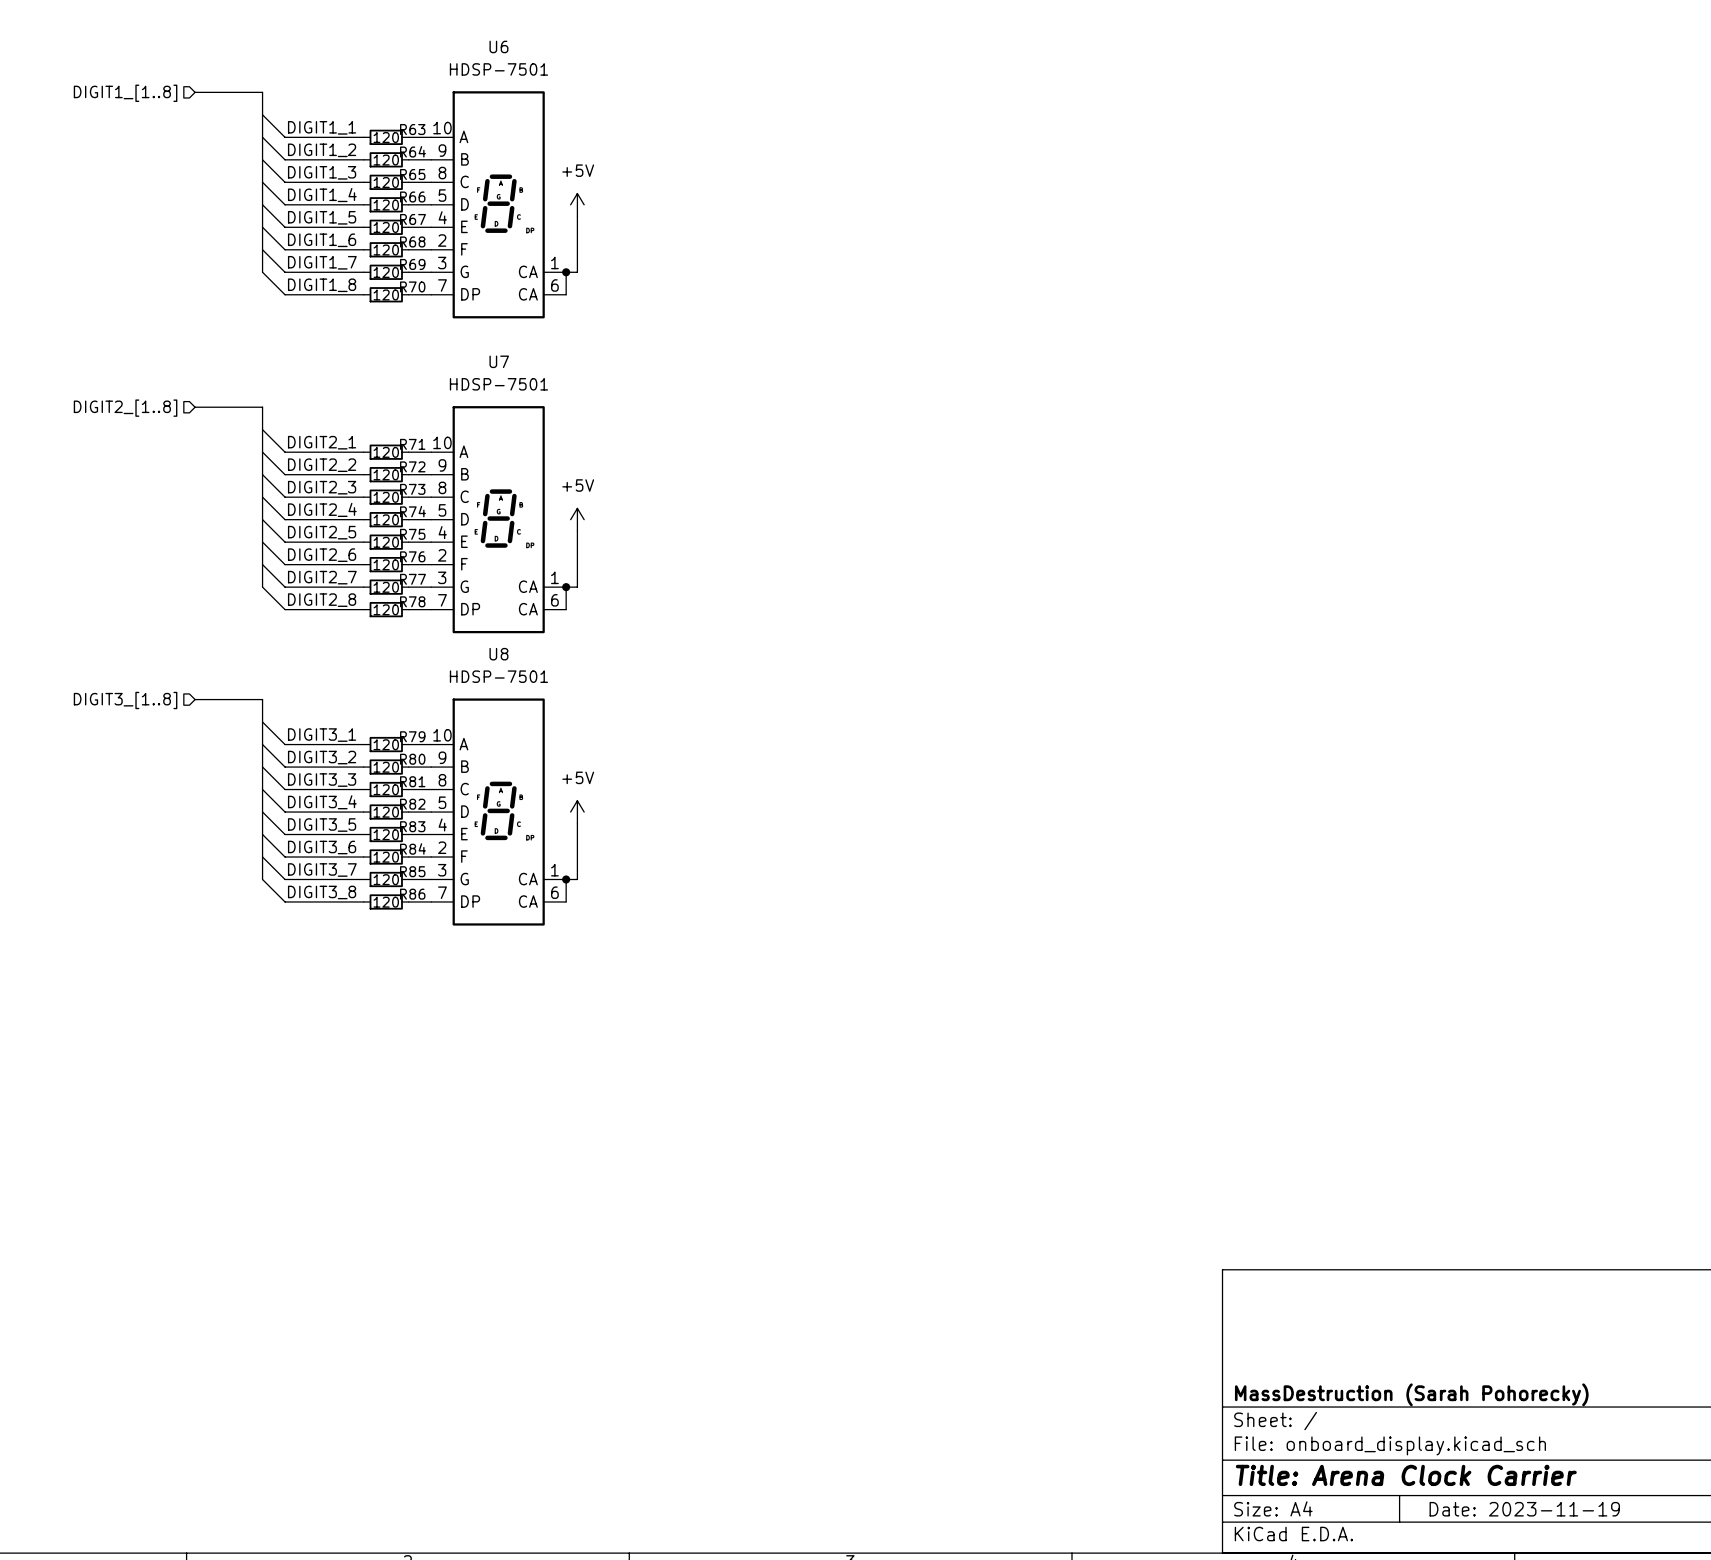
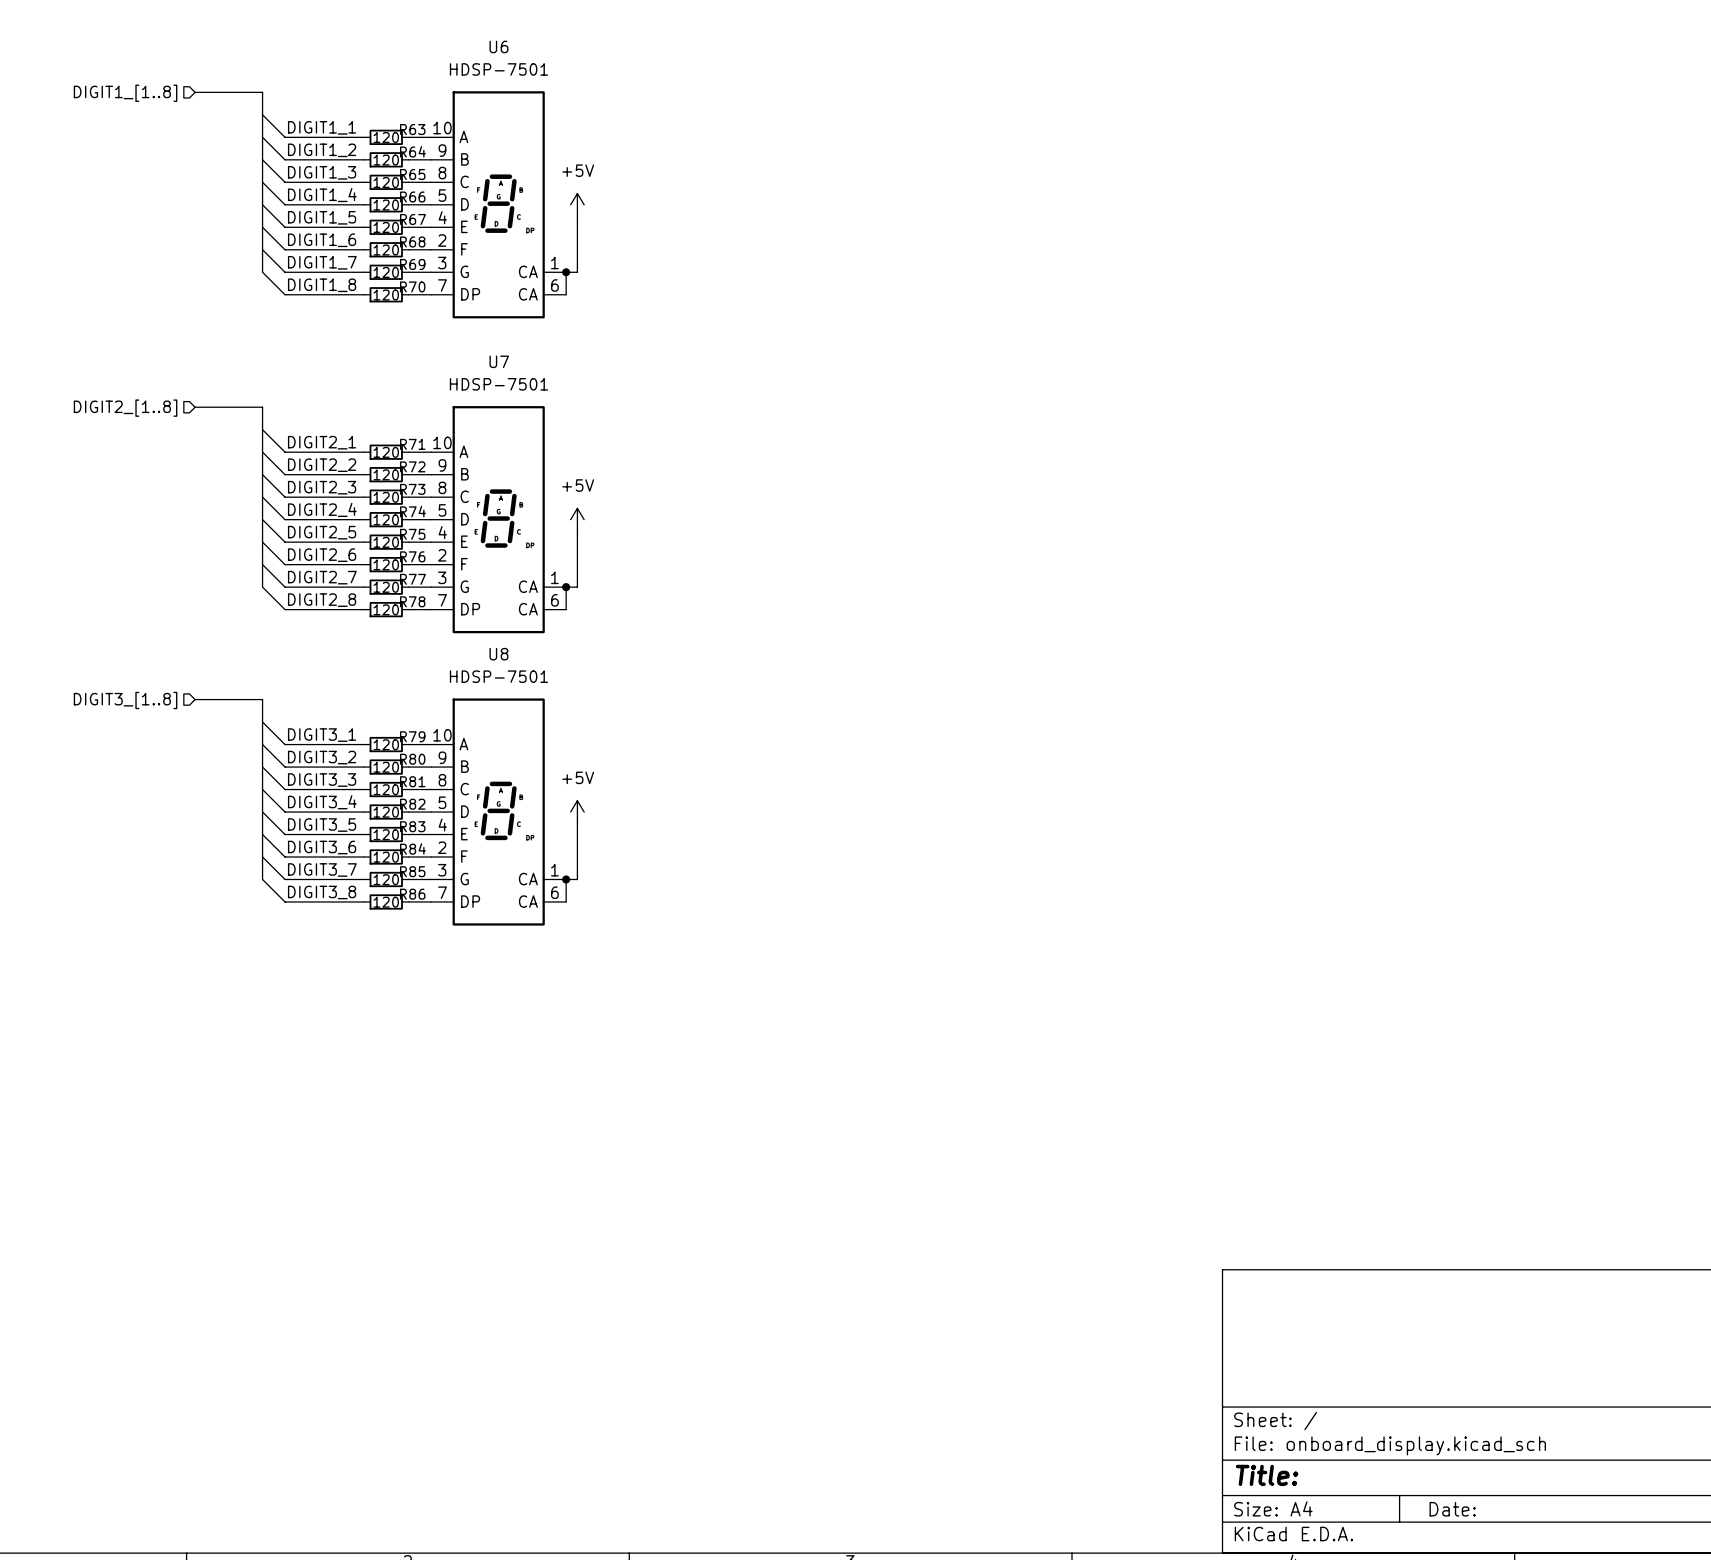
title block: MassDestruction (Sarah Pohorecky) (1411, 1394) -> none
title block: Title: Arena Clock Carrier (1406, 1475) -> Title: (1267, 1475)
title block: Date: 2023-11-19 (1524, 1509) -> Date: (1452, 1509)

